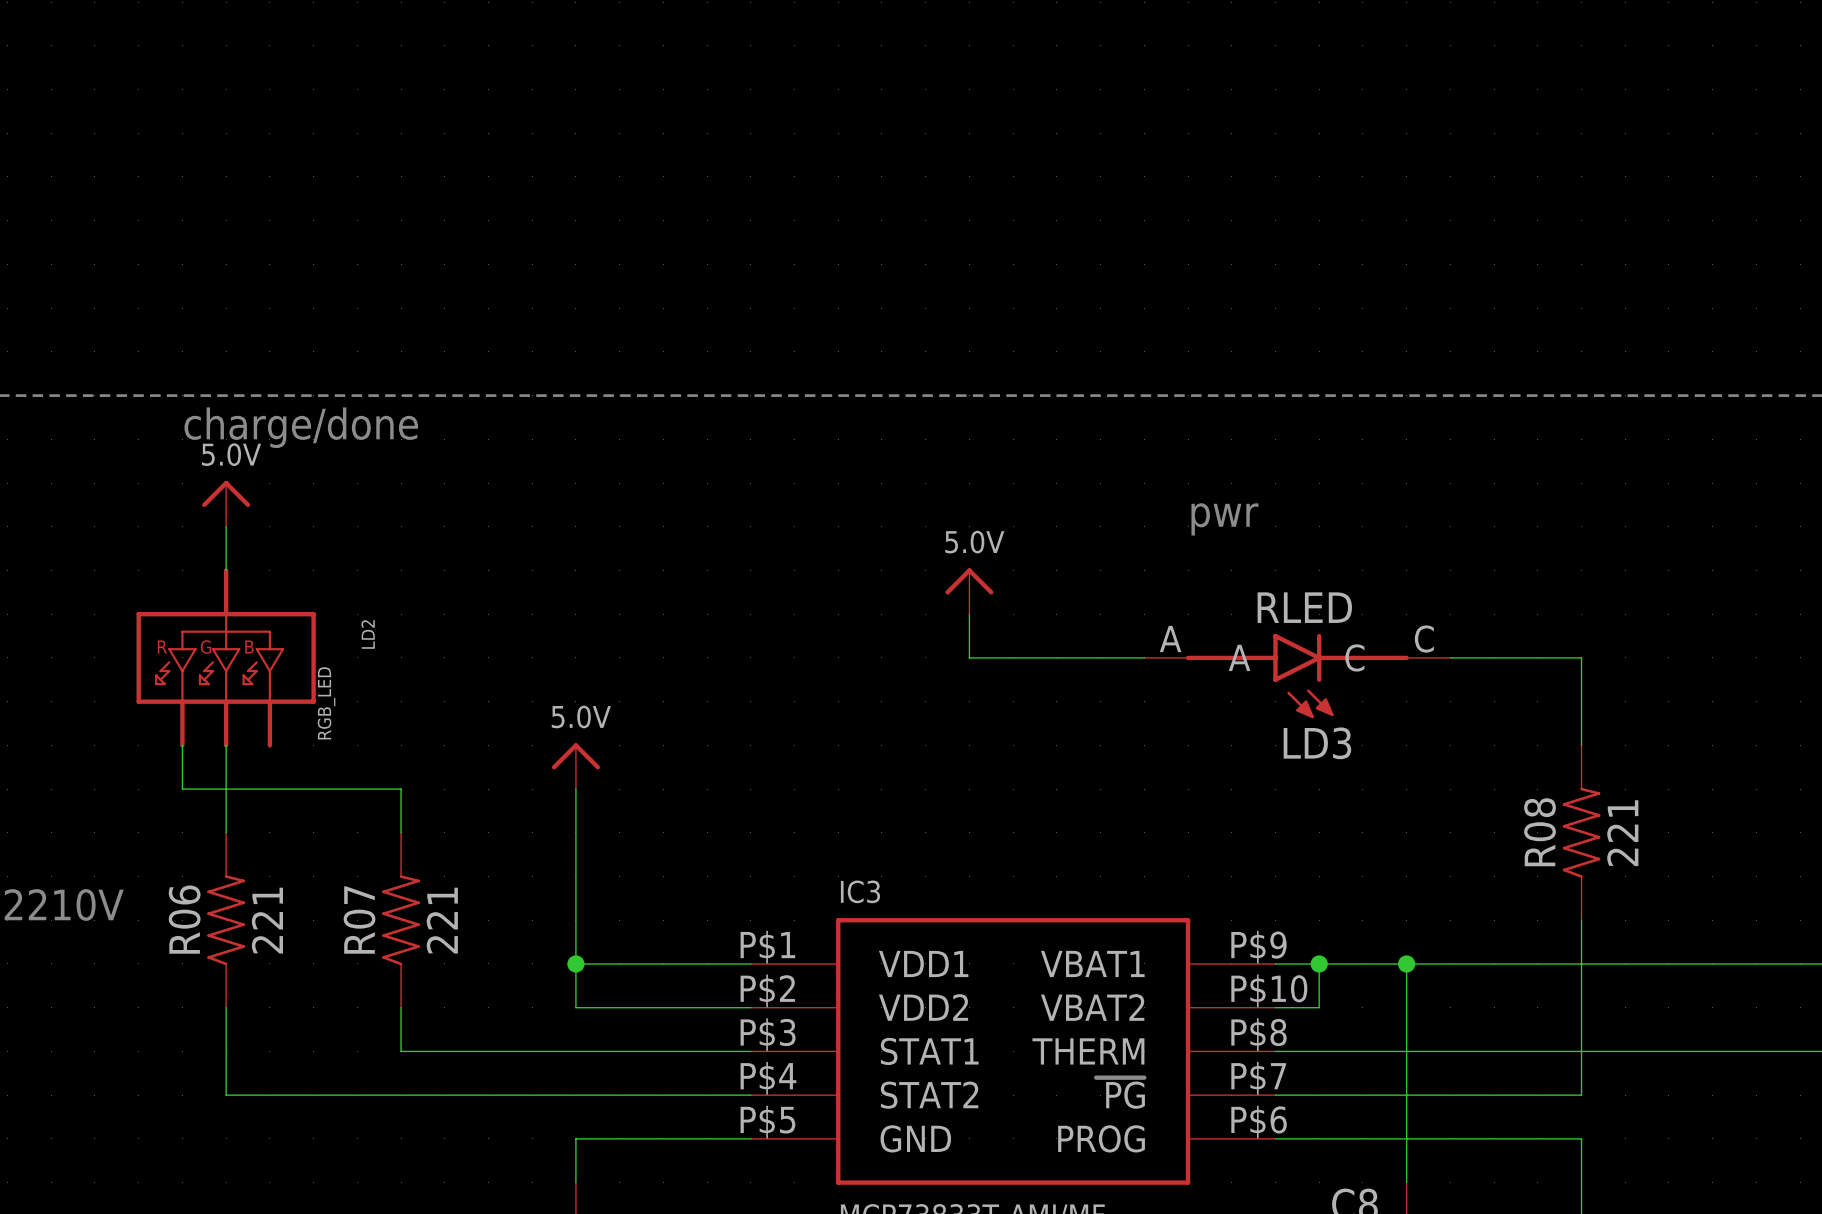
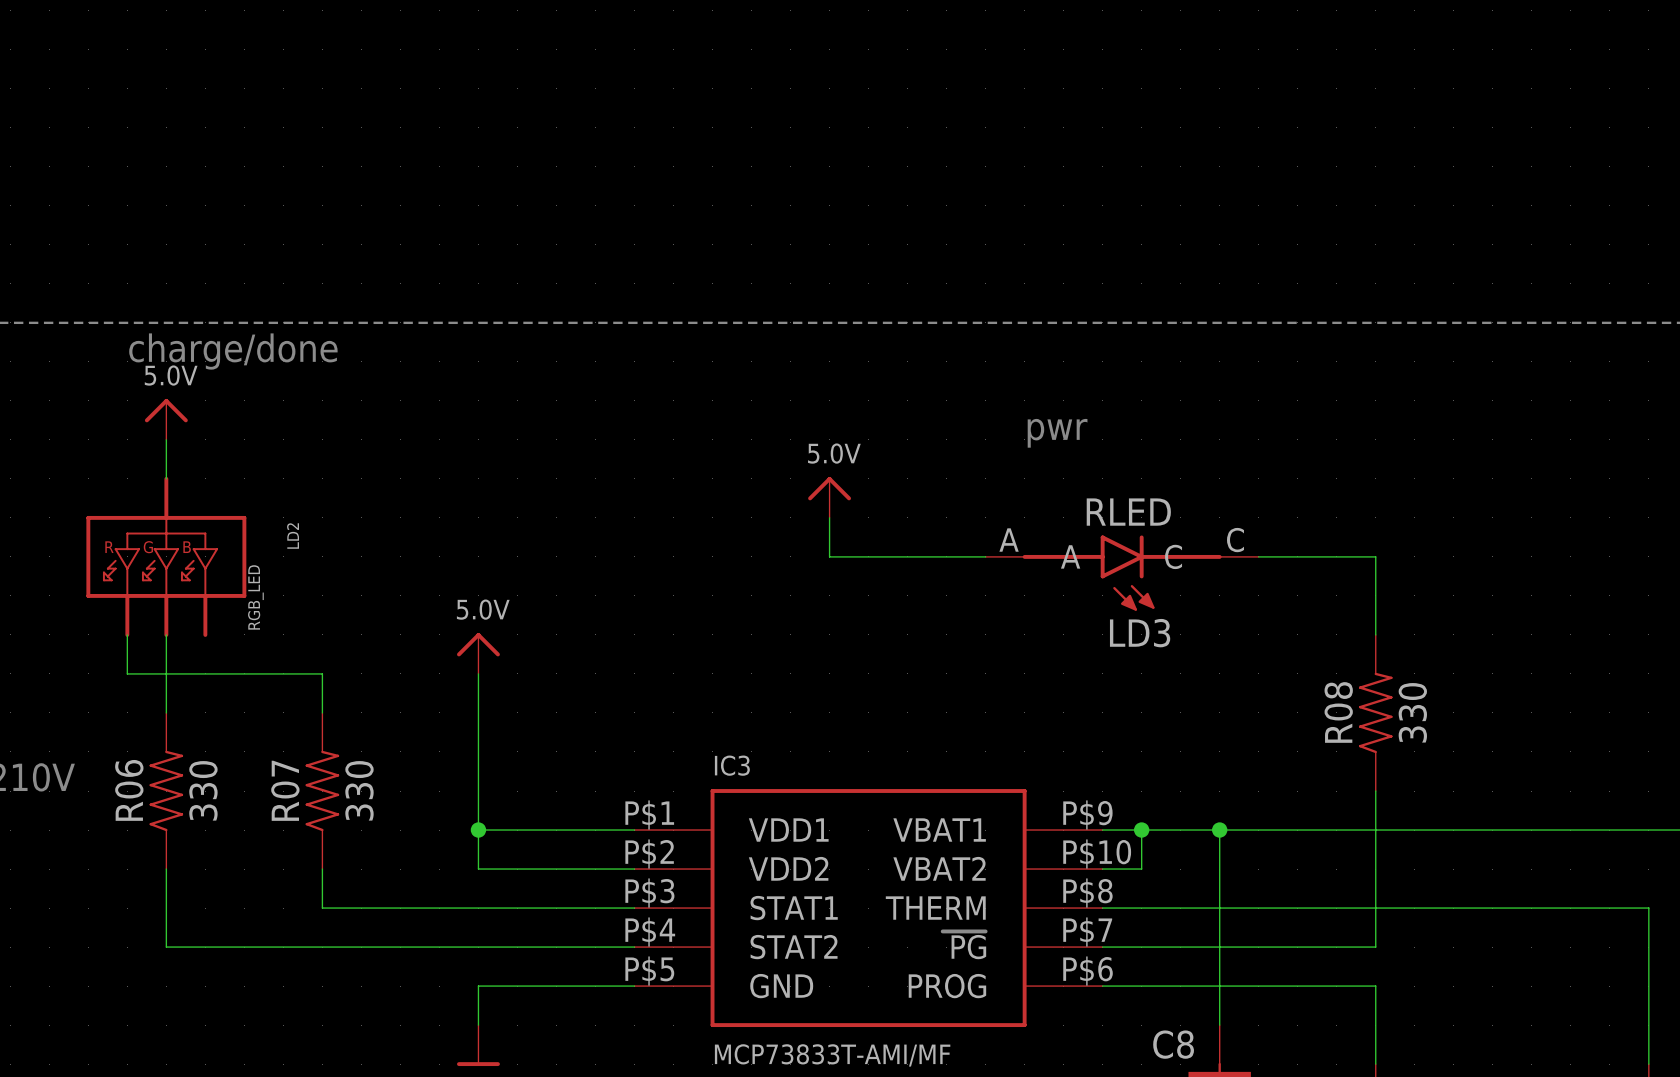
R08 value: 221 (1622, 833) -> 330 (1412, 712)
R06 value: 221 (267, 920) -> 330 (203, 790)
R07 value: 221 (442, 920) -> 330 (359, 790)

